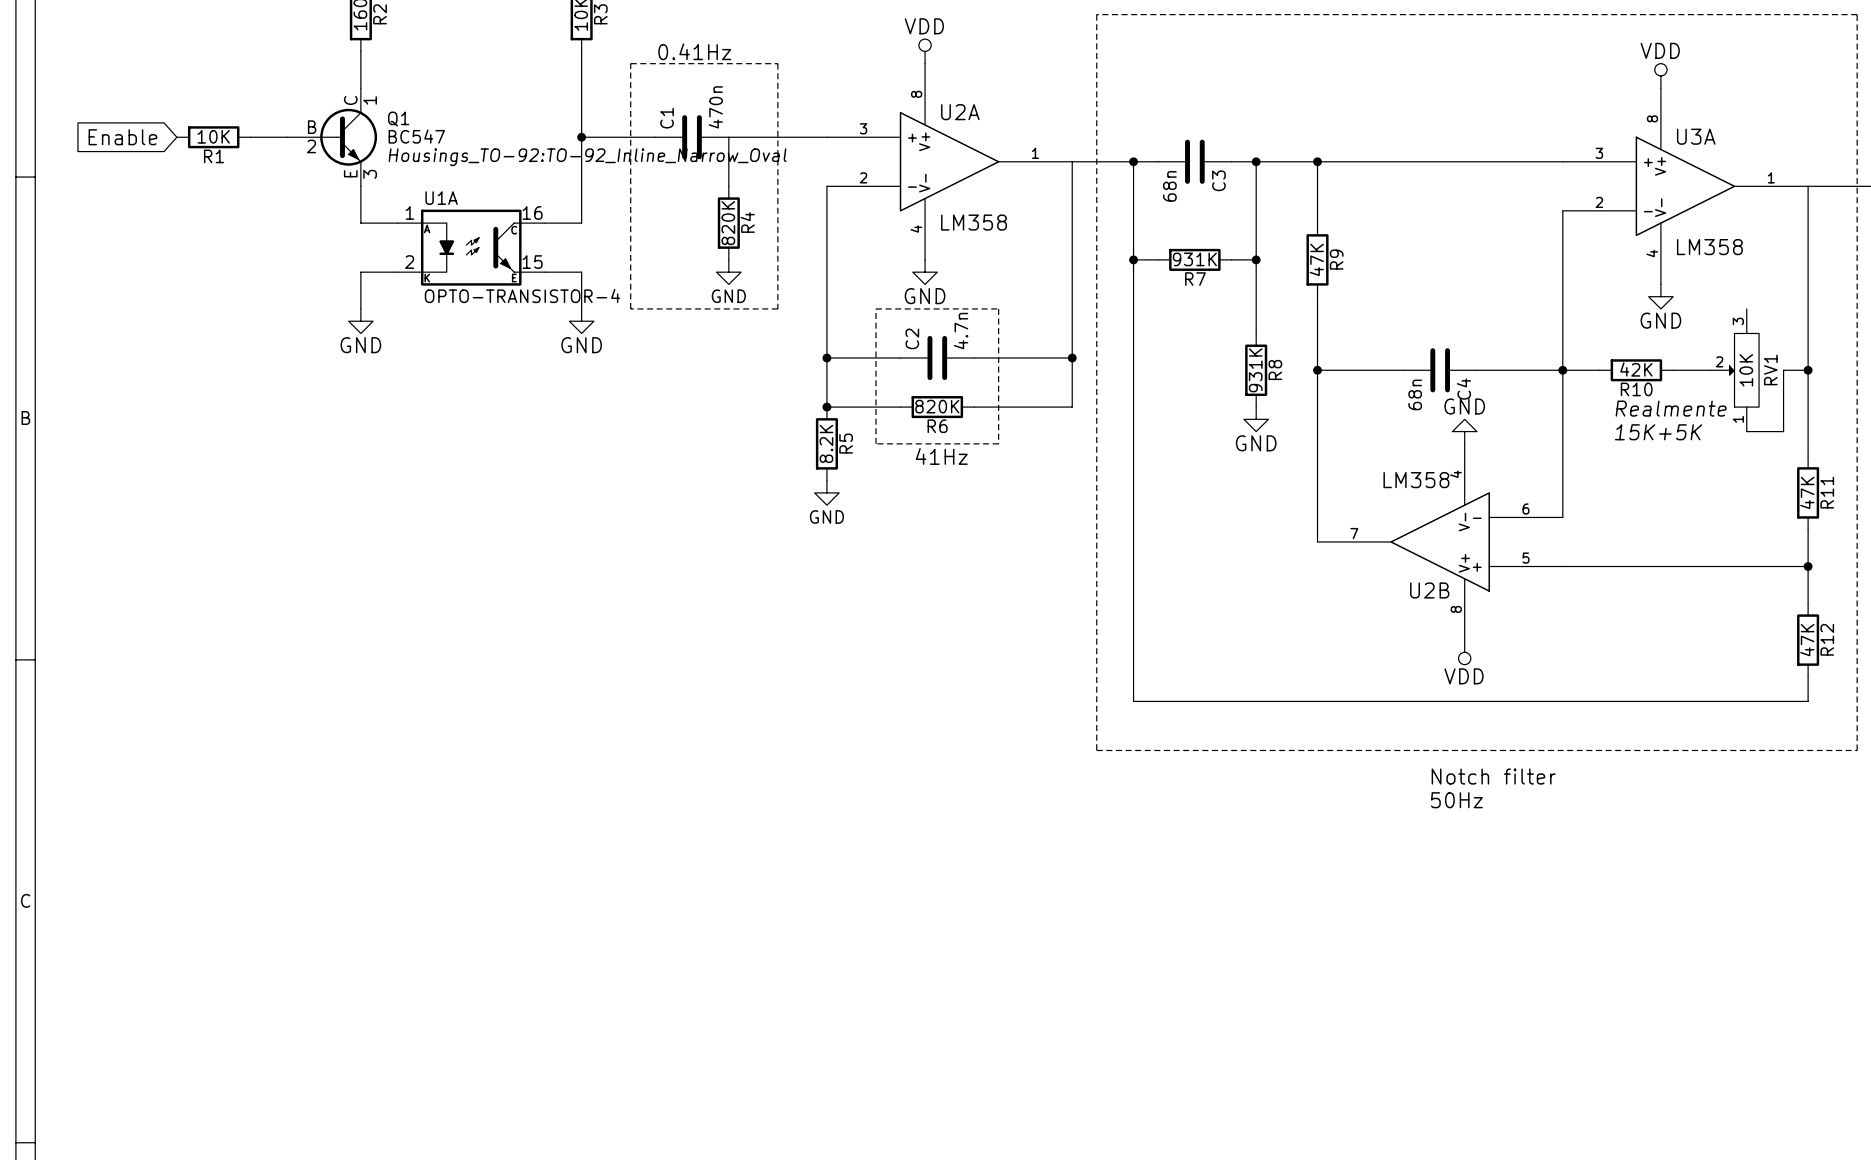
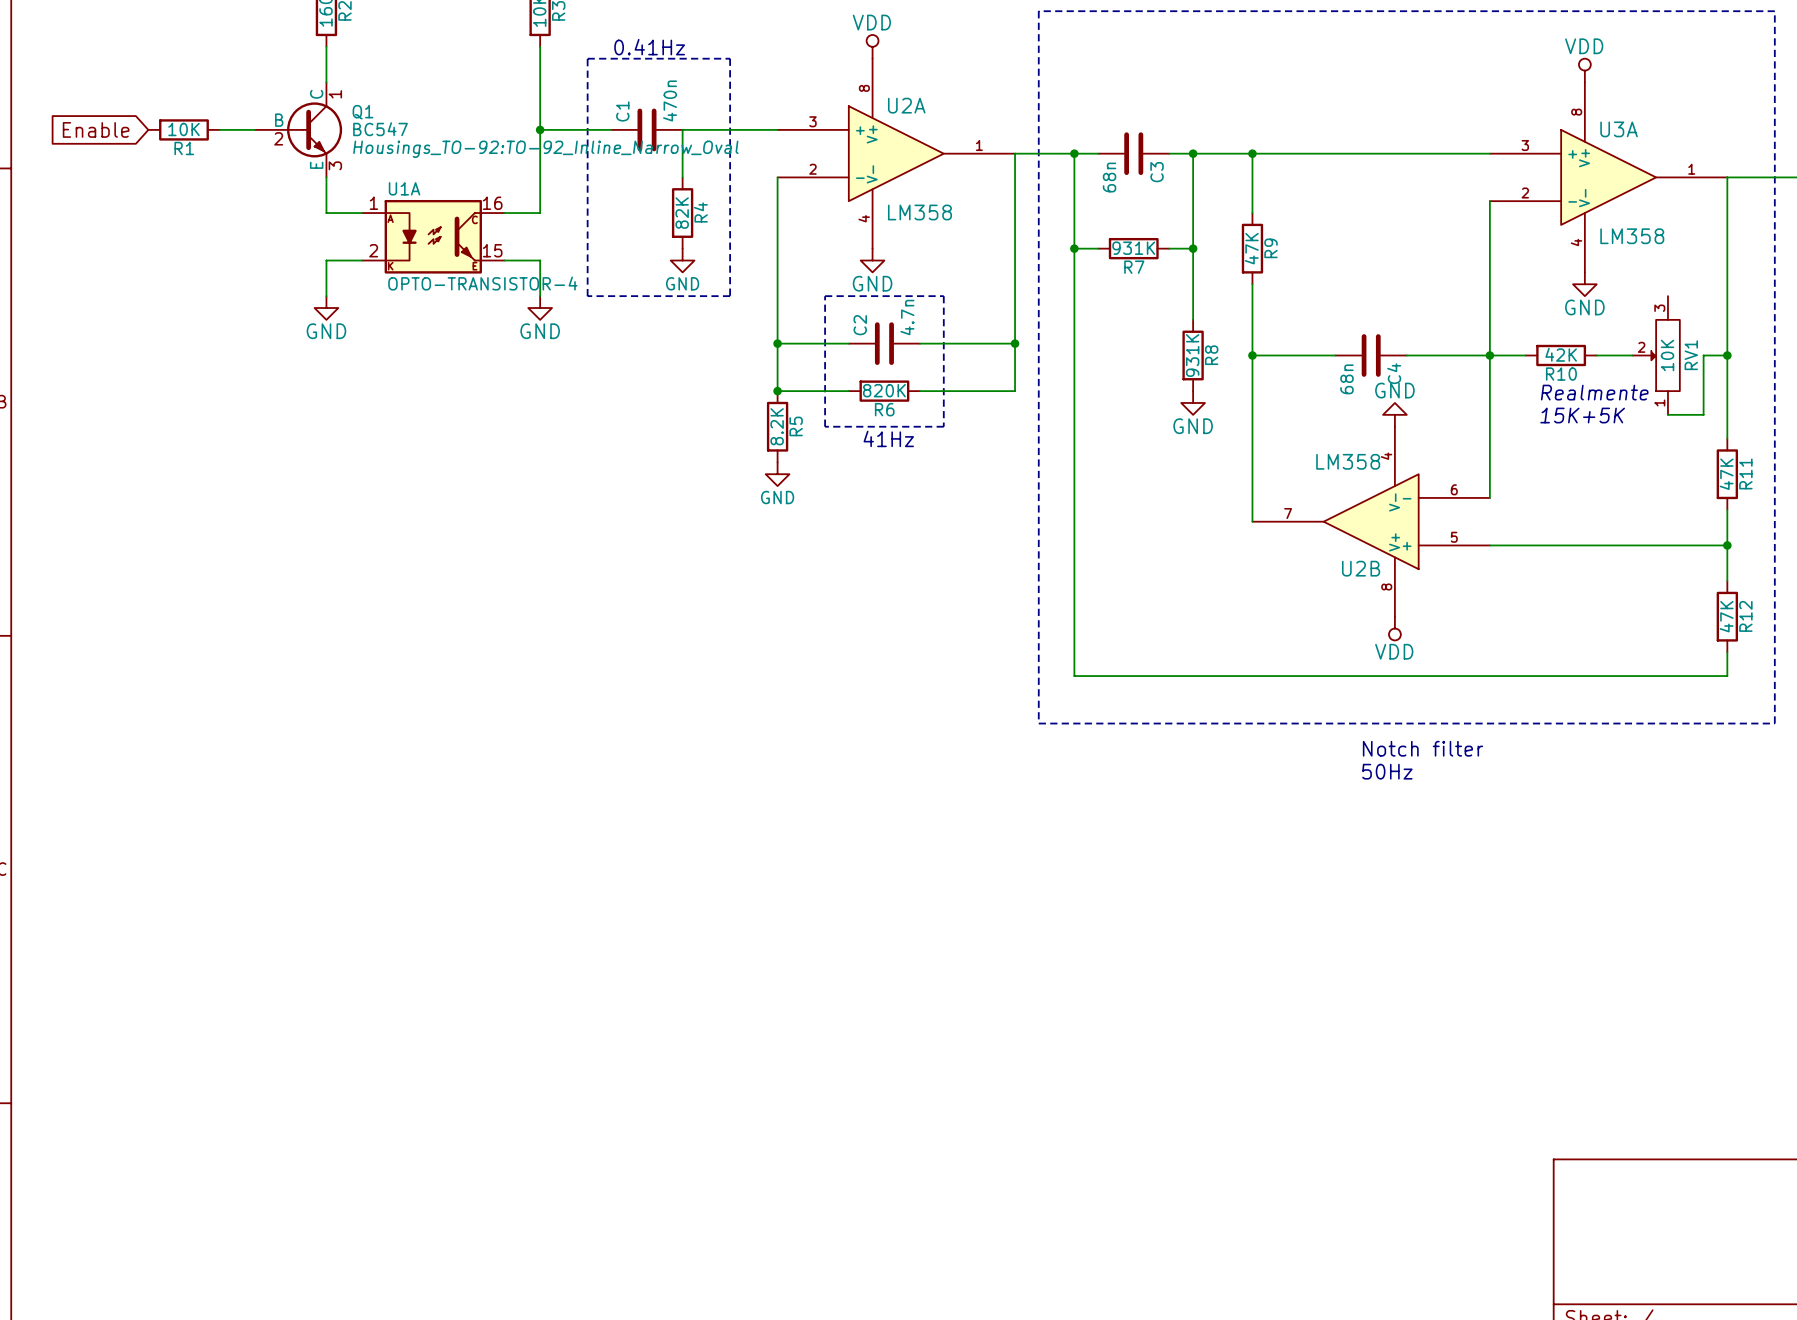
R4 value: 820K (728, 223) -> 82K (682, 213)

